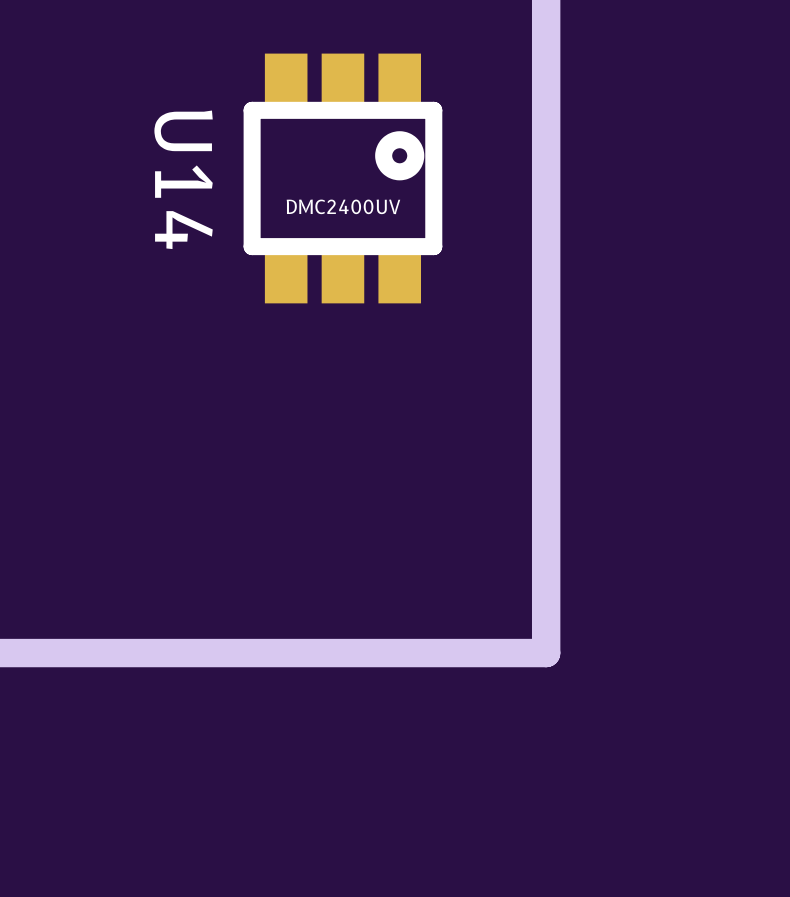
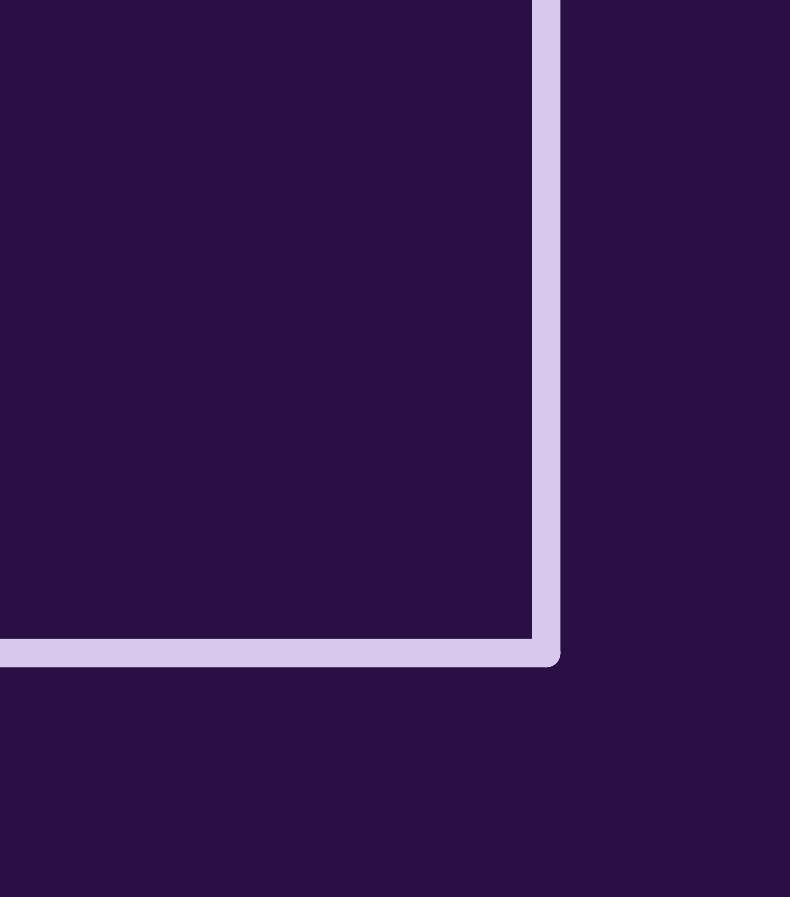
U14: DMC2400UV (342, 178) -> none

